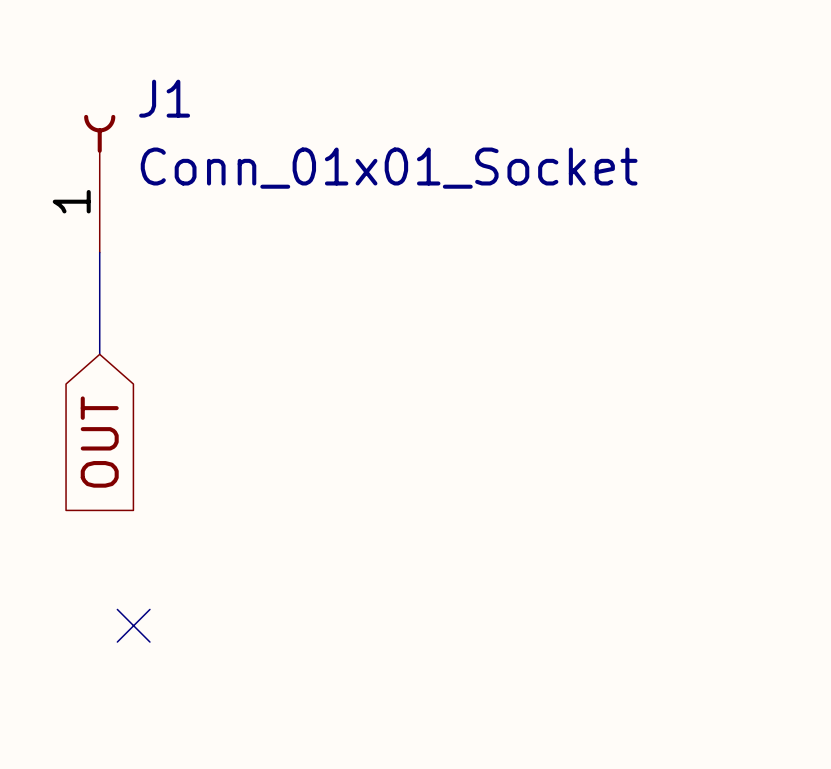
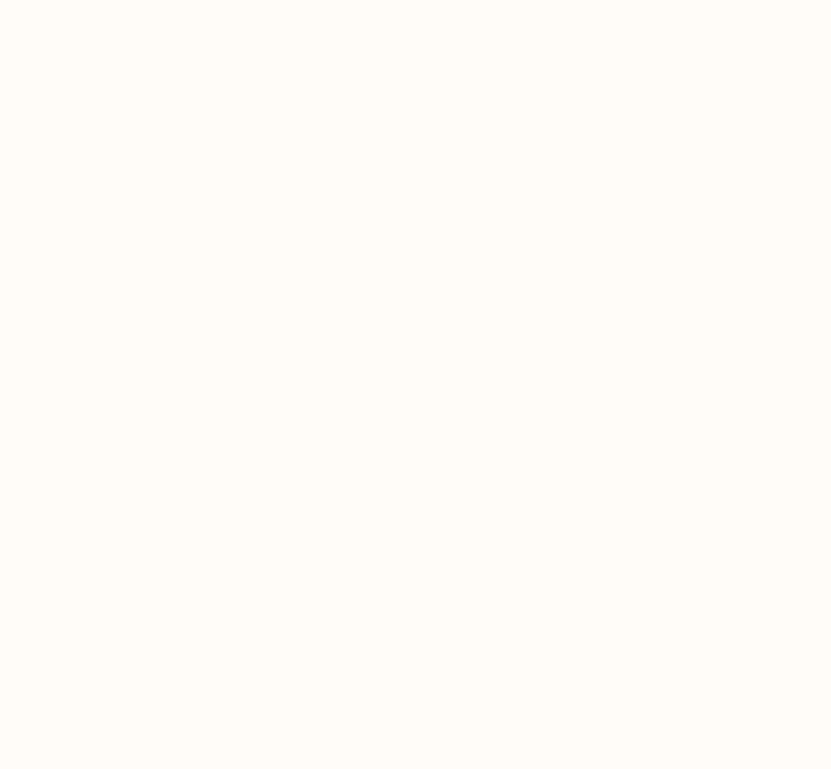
J1: Conn_01x01_Socket (99, 183) -> none
wire: (99, 252) (99, 354) -> none
global label: OUT (99, 442) -> none
no-connect mark: (133, 625) -> none

